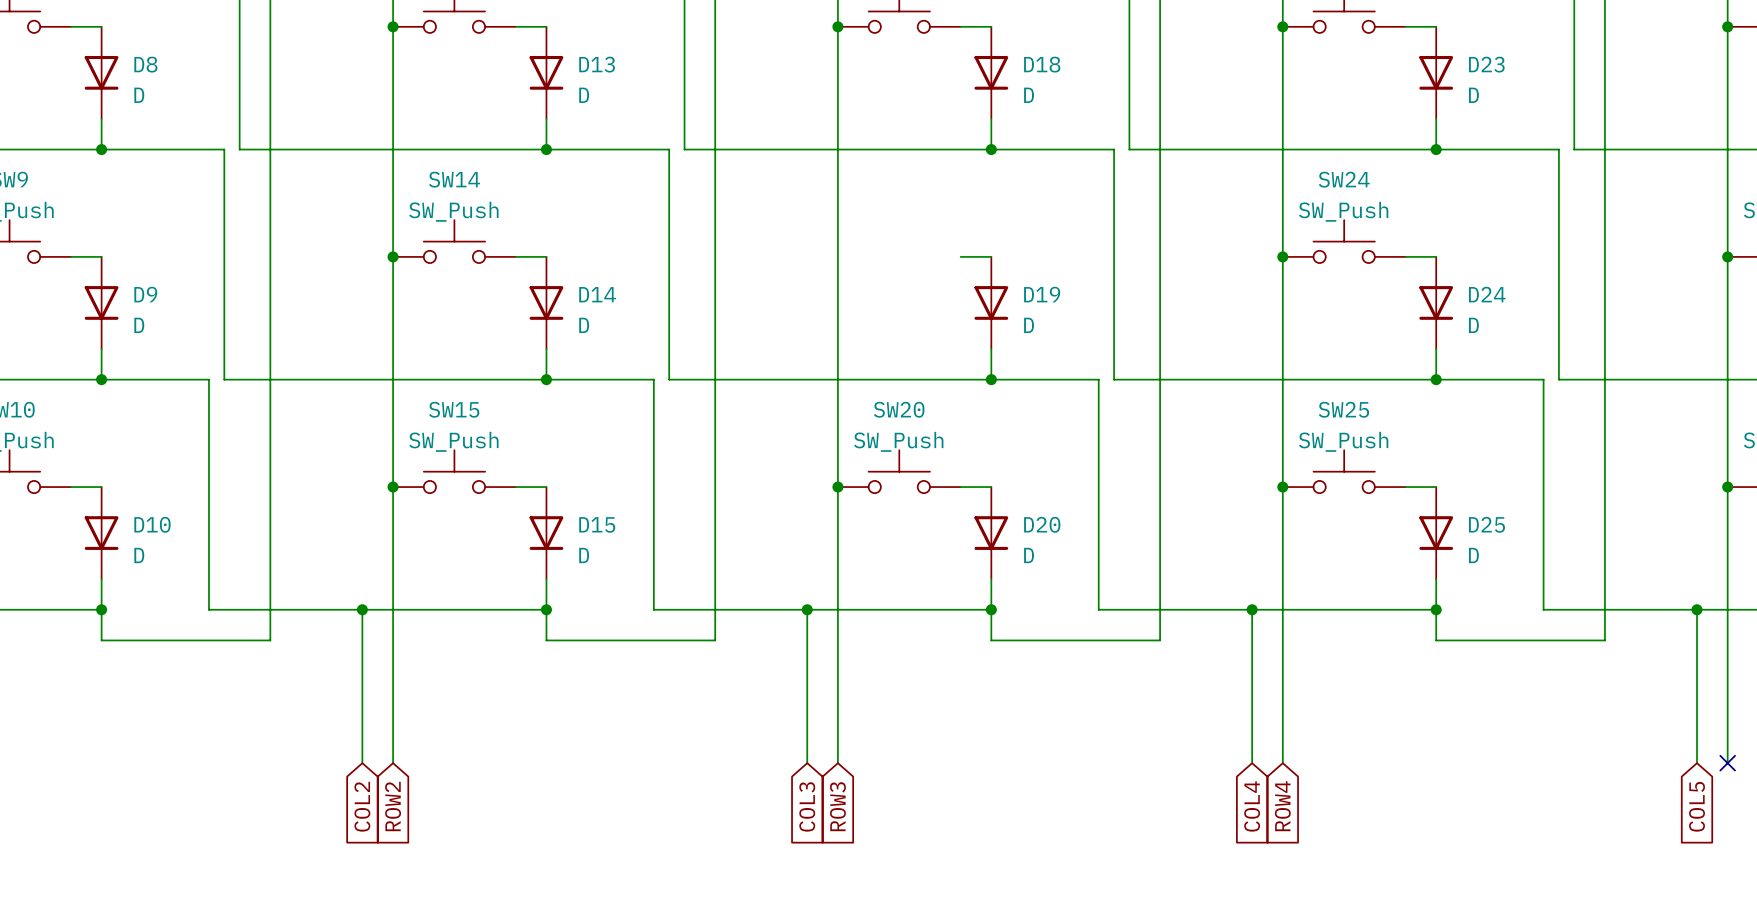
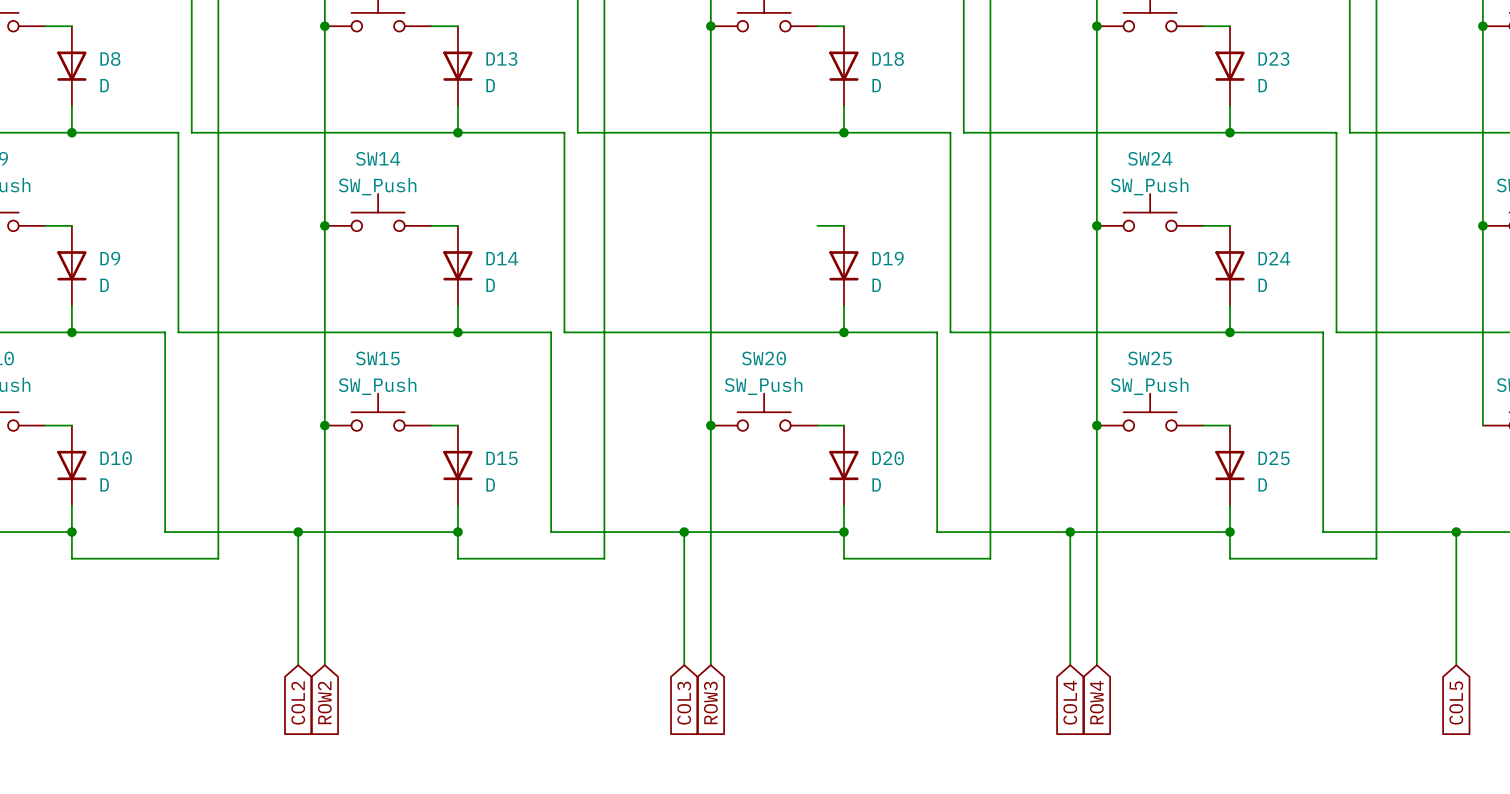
wire: (1727, 487) (1727, 763) -> none
junction: (1727, 487) -> none
no-connect mark: (1727, 763) -> none

